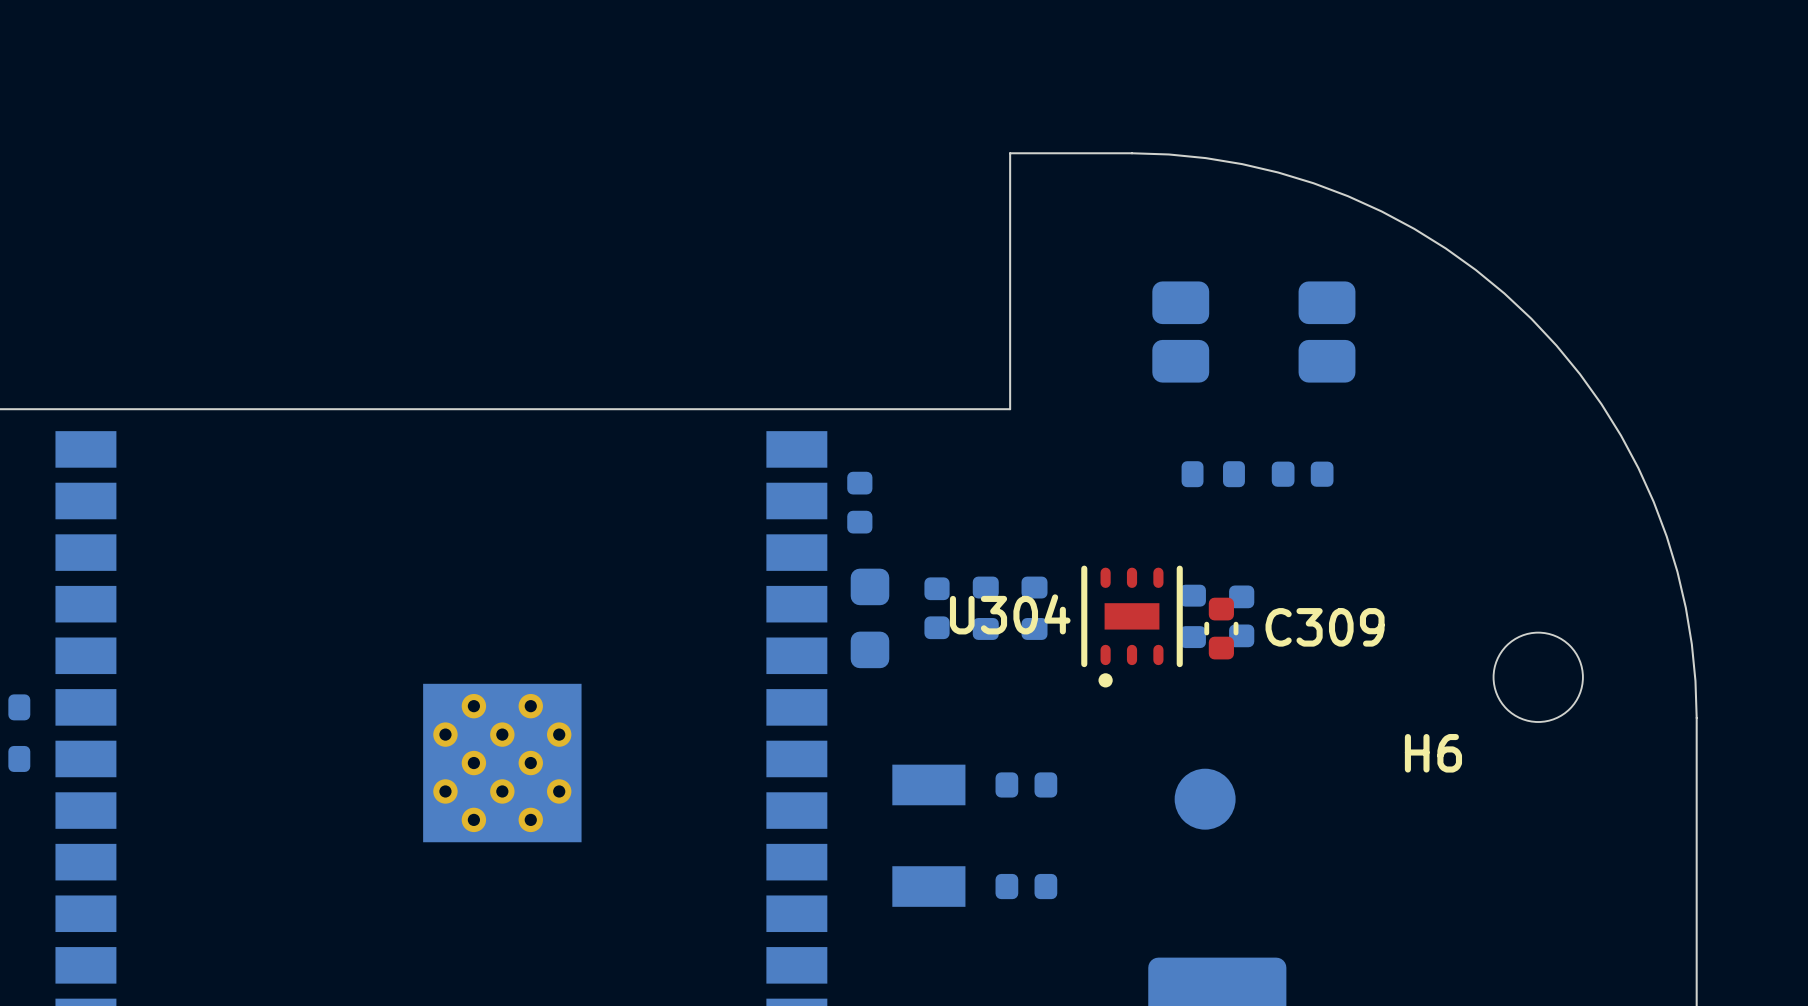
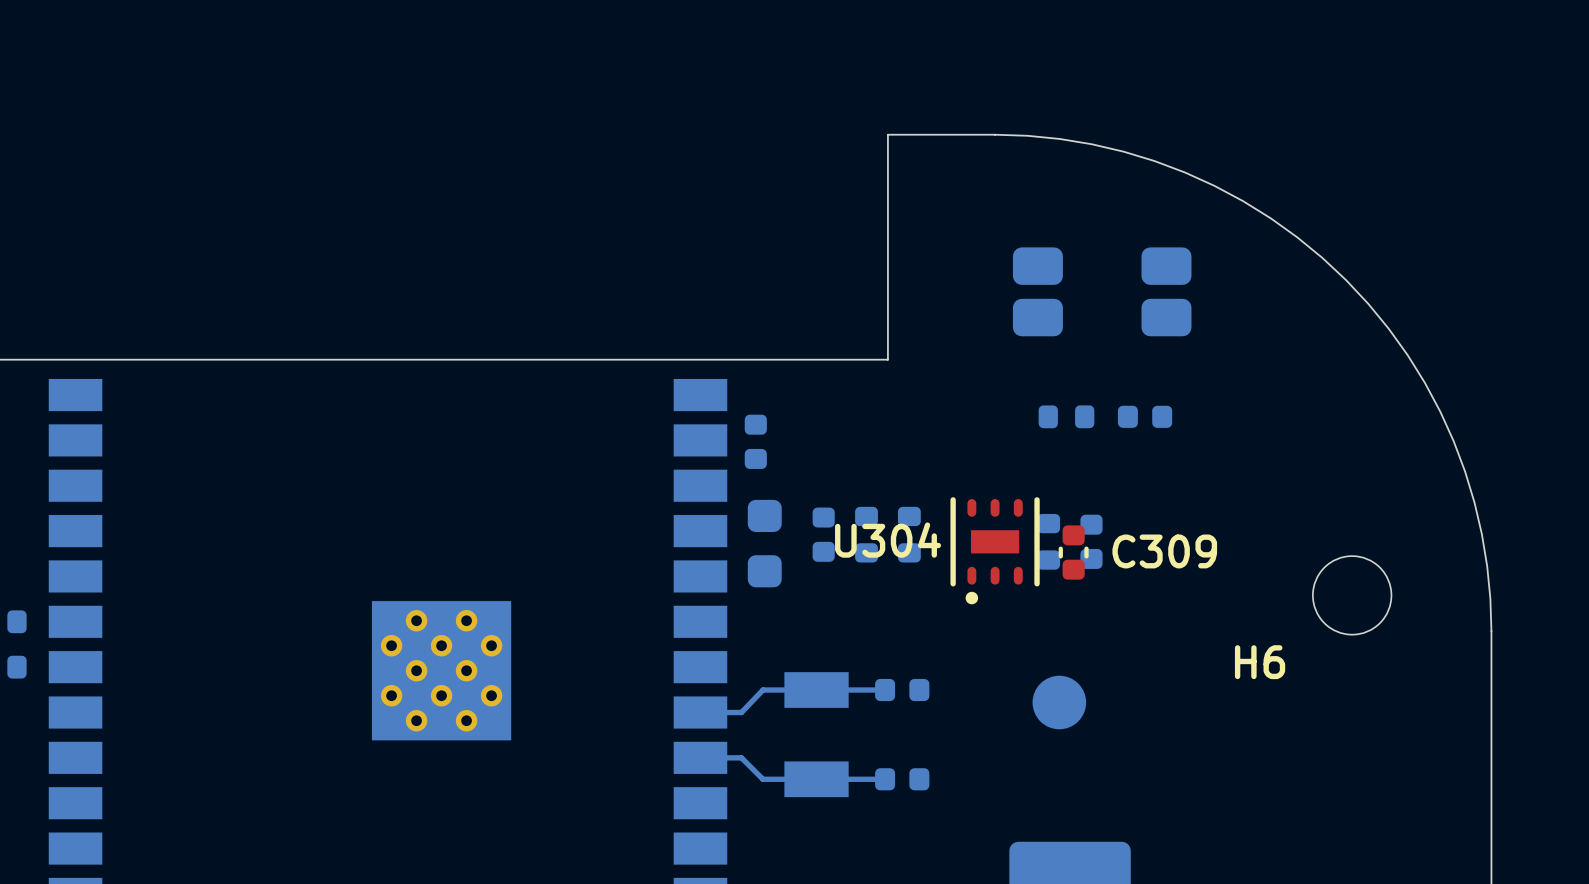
bottom track: none -> (885, 690) (762, 690) (741, 712) (700, 712)
bottom track: none -> (700, 757) (741, 757) (762, 779) (885, 779)

